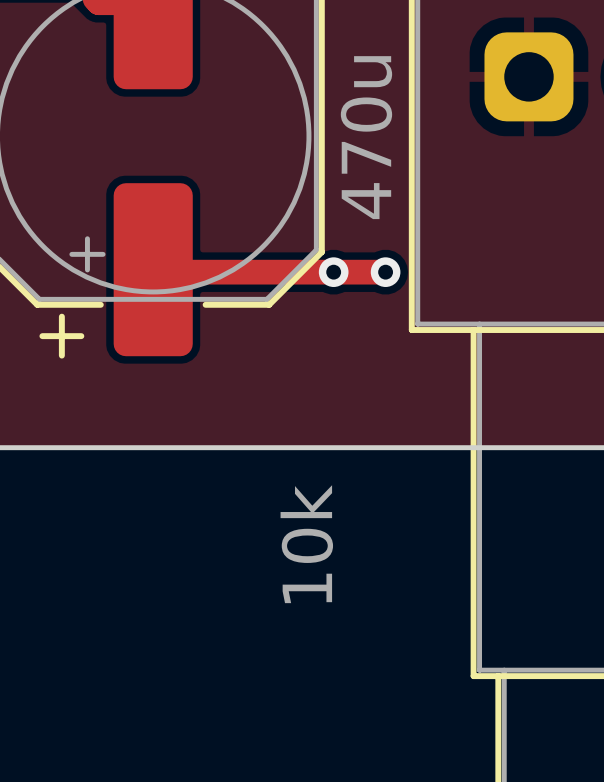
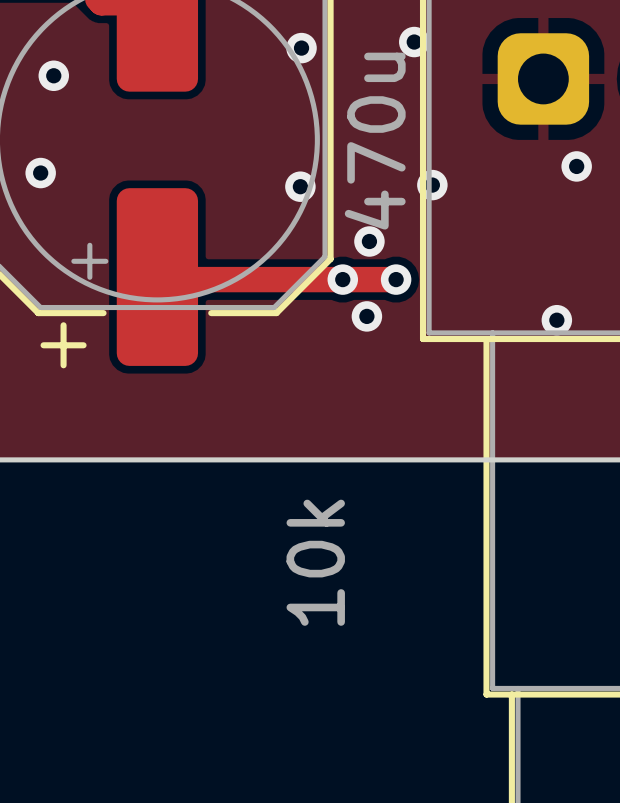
via: none -> (414, 42)
via: none -> (301, 48)
via: none -> (53, 75)
via: none -> (576, 166)
via: none -> (40, 173)
via: none -> (432, 185)
via: none -> (300, 186)
via: none -> (369, 241)
via: none -> (366, 316)
via: none -> (556, 320)

